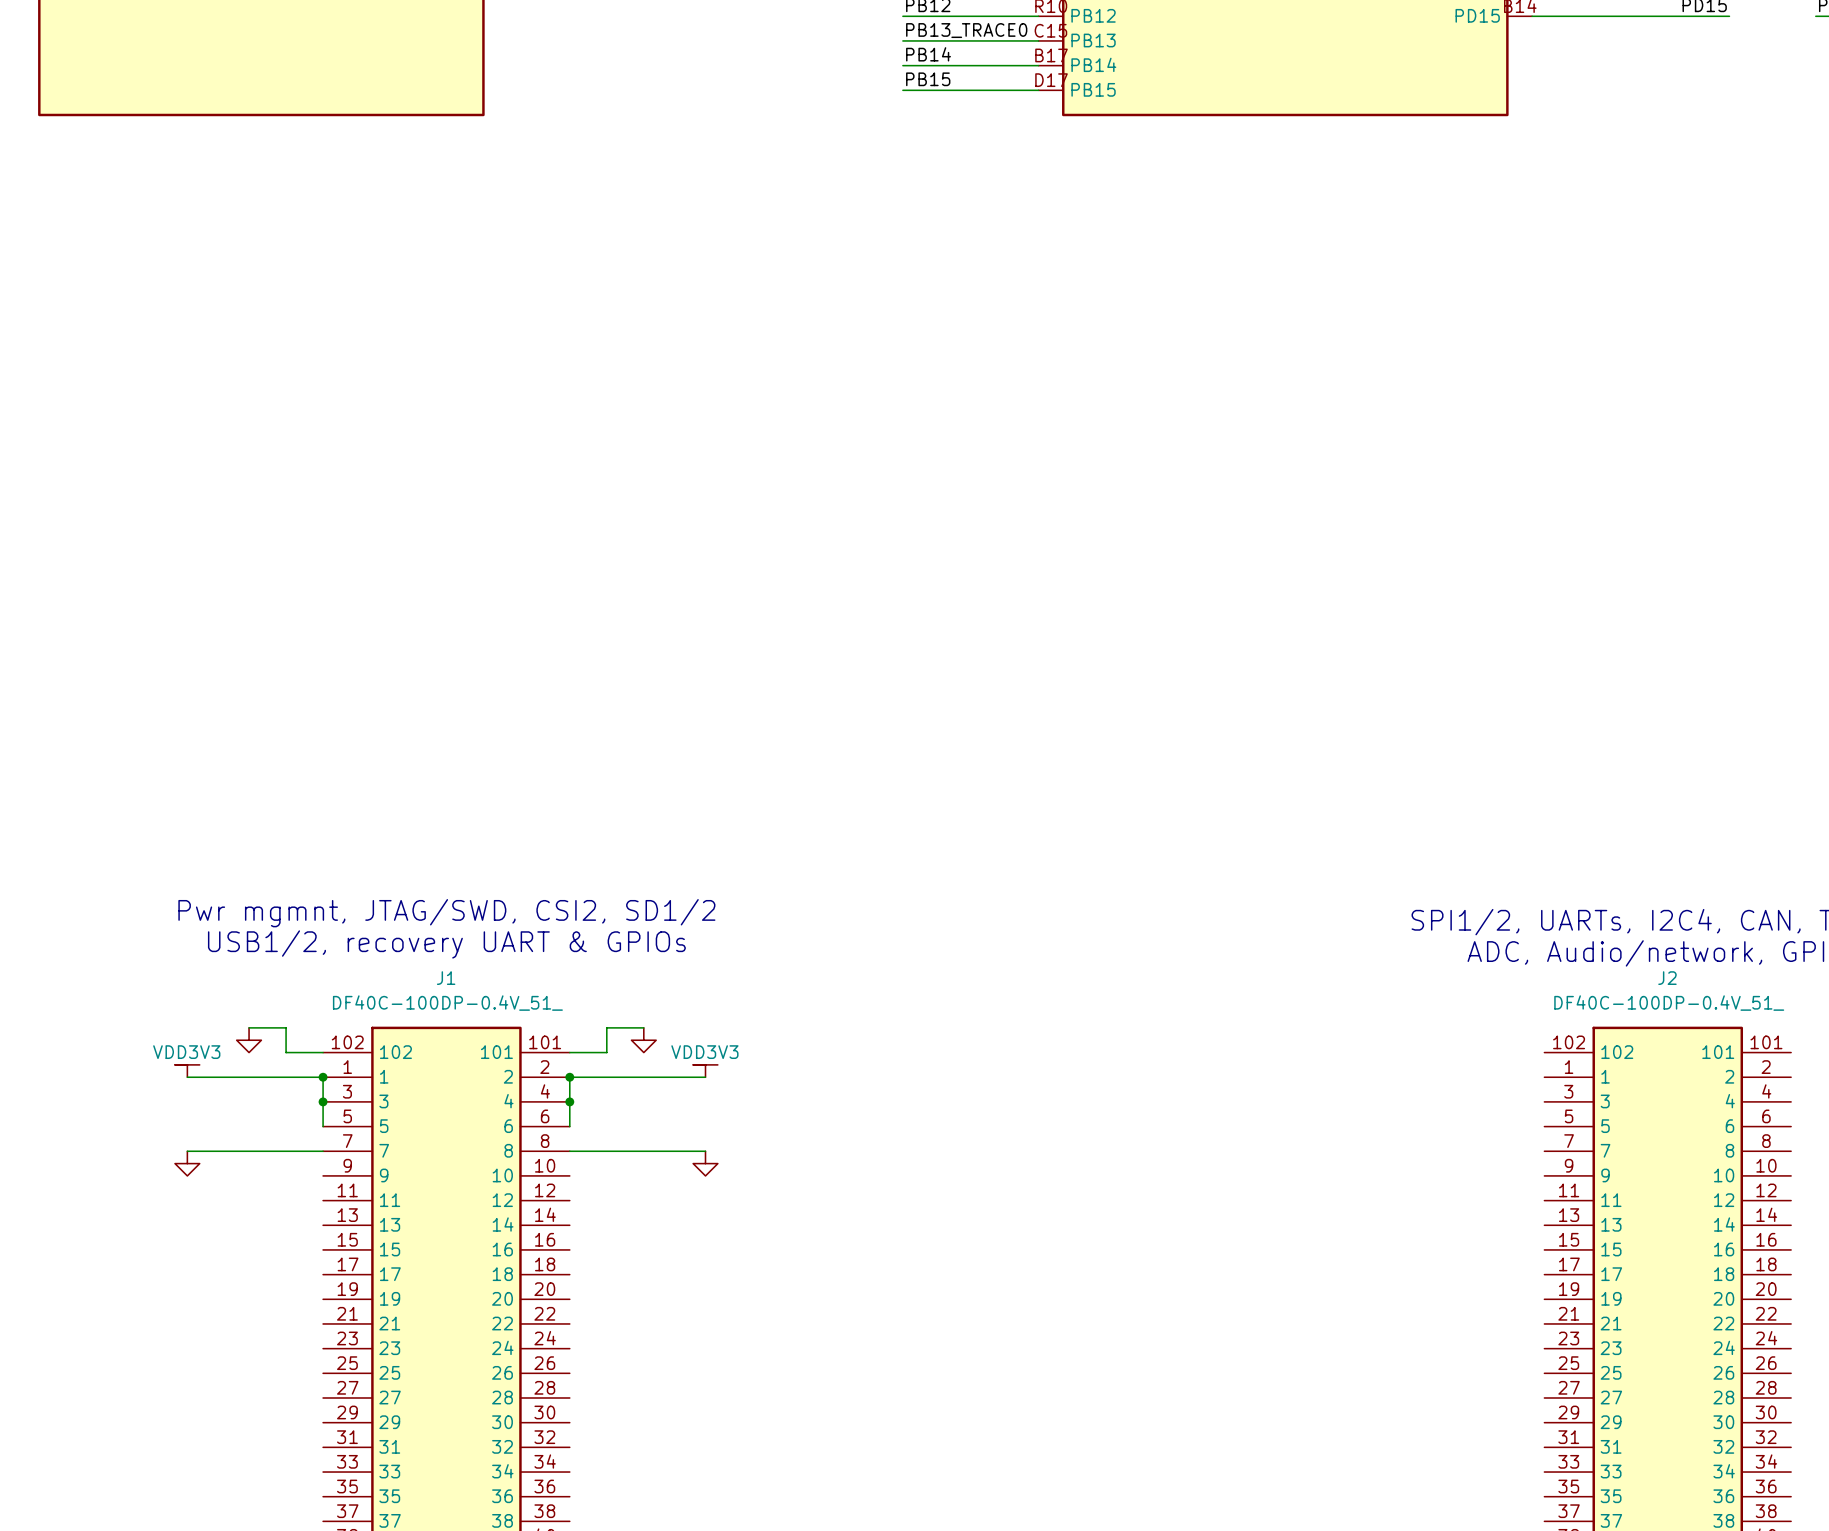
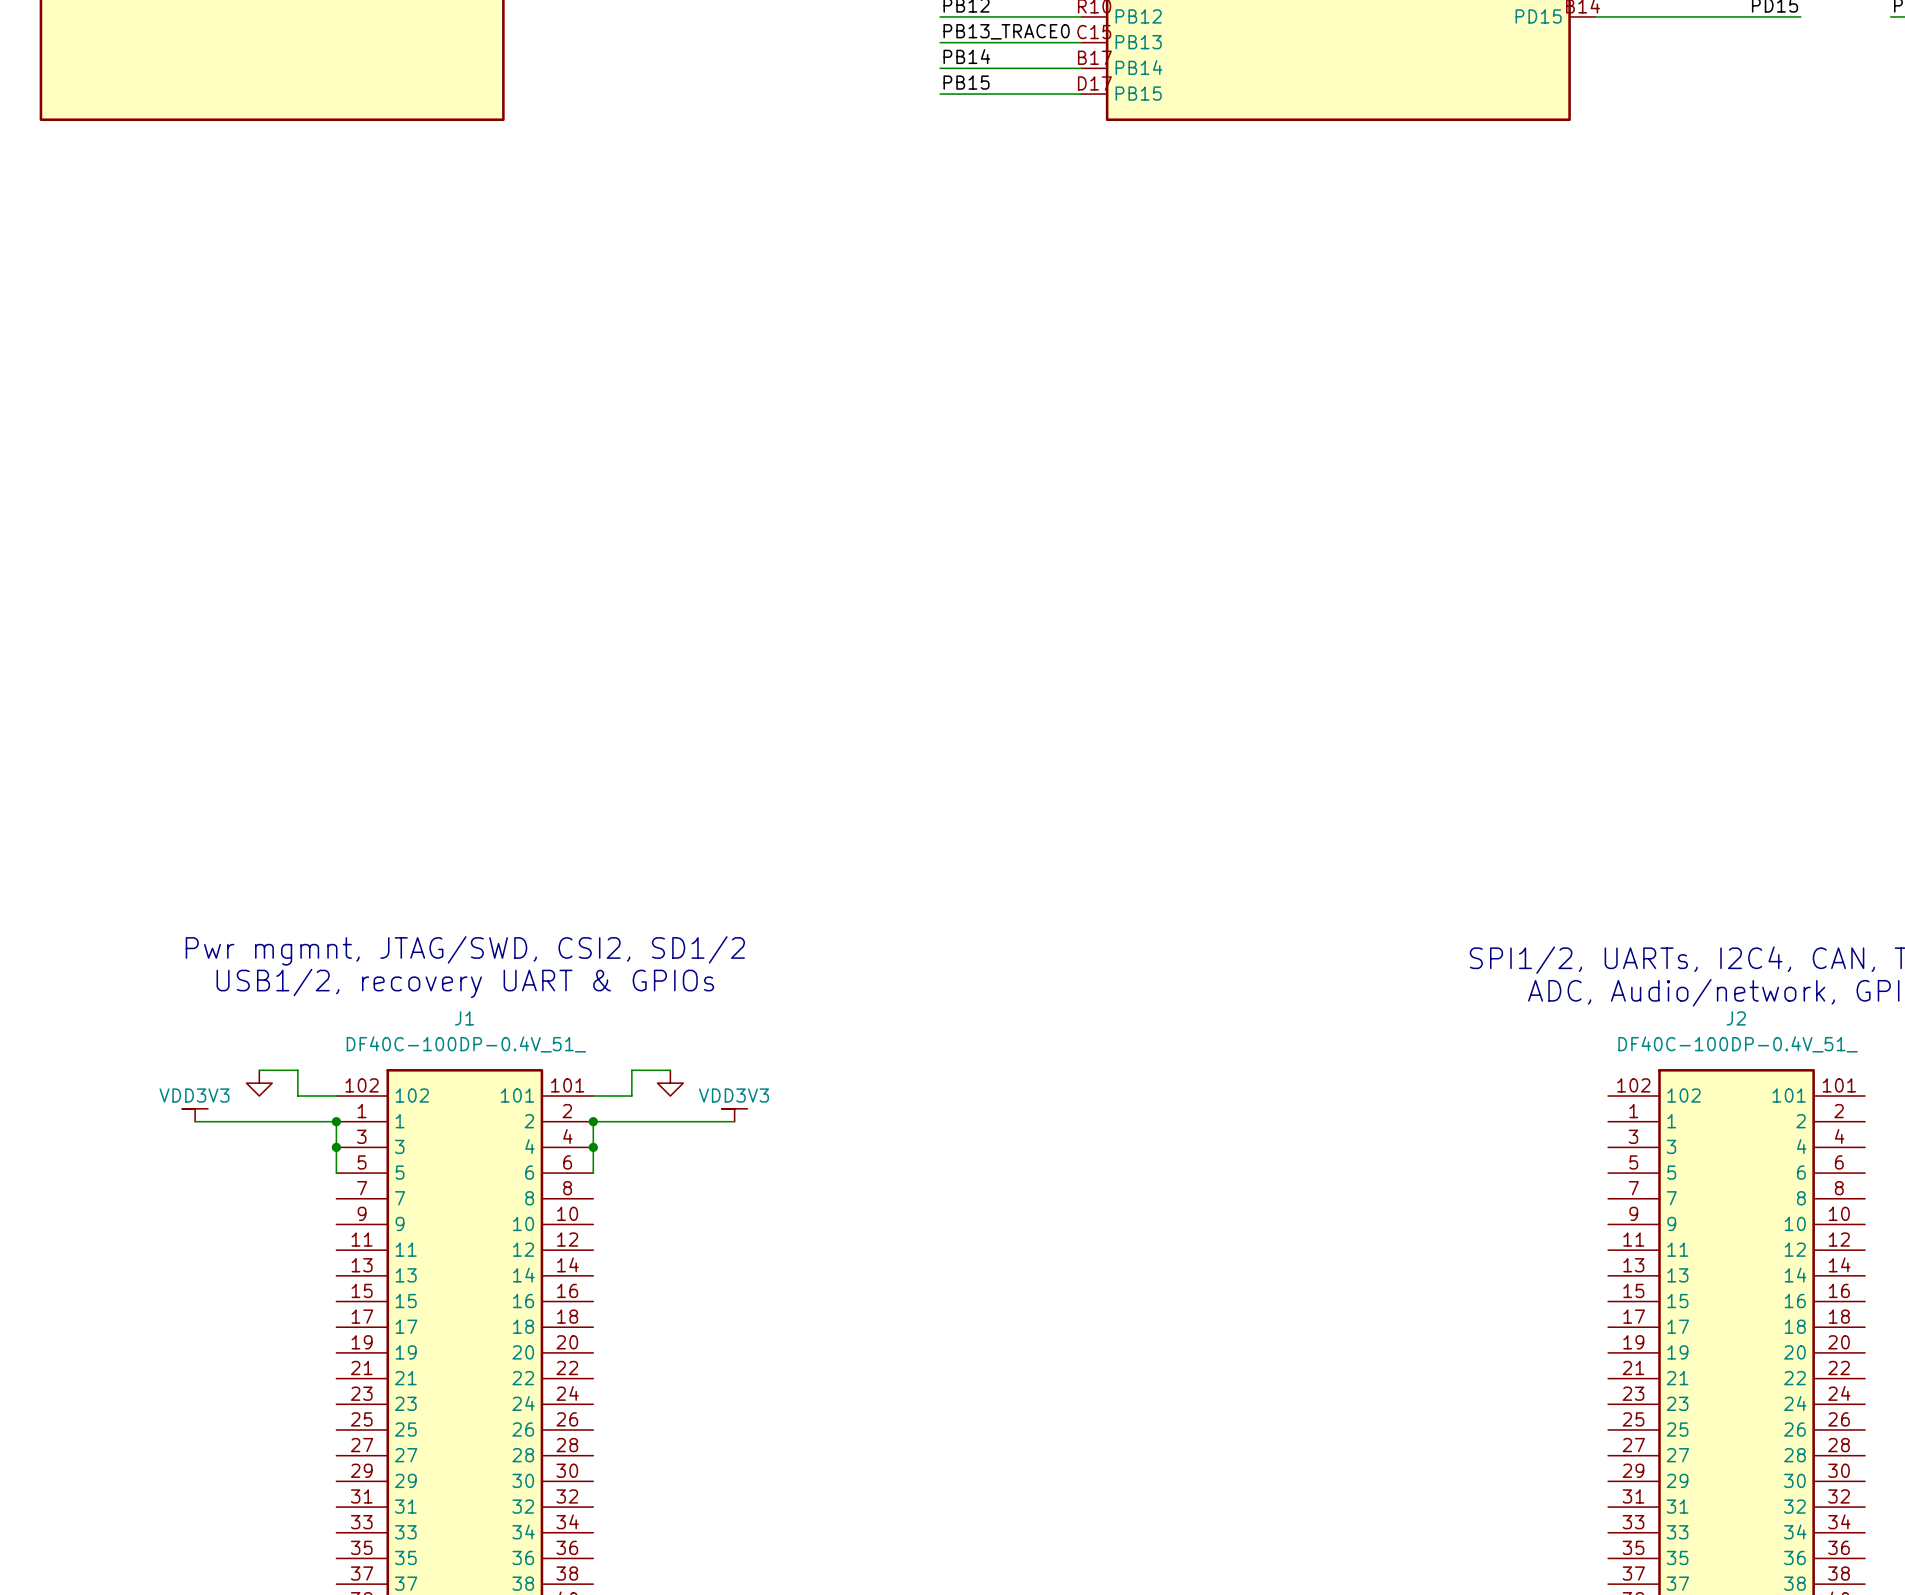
wire: (187, 1151) (323, 1151) -> none
wire: (569, 1151) (705, 1151) -> none
power symbol: (187, 1163) -> none
power symbol: (705, 1163) -> none

